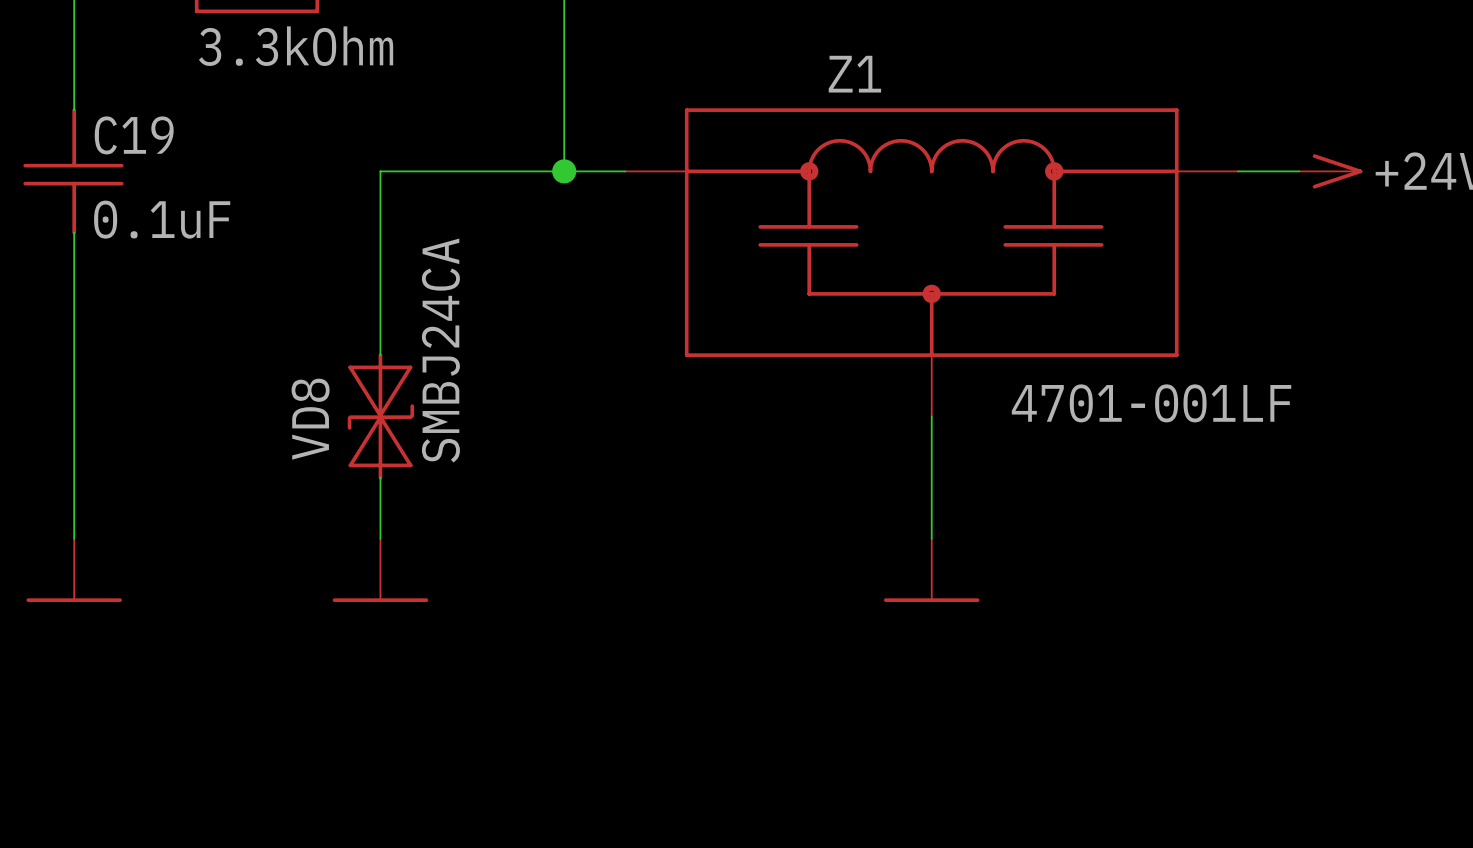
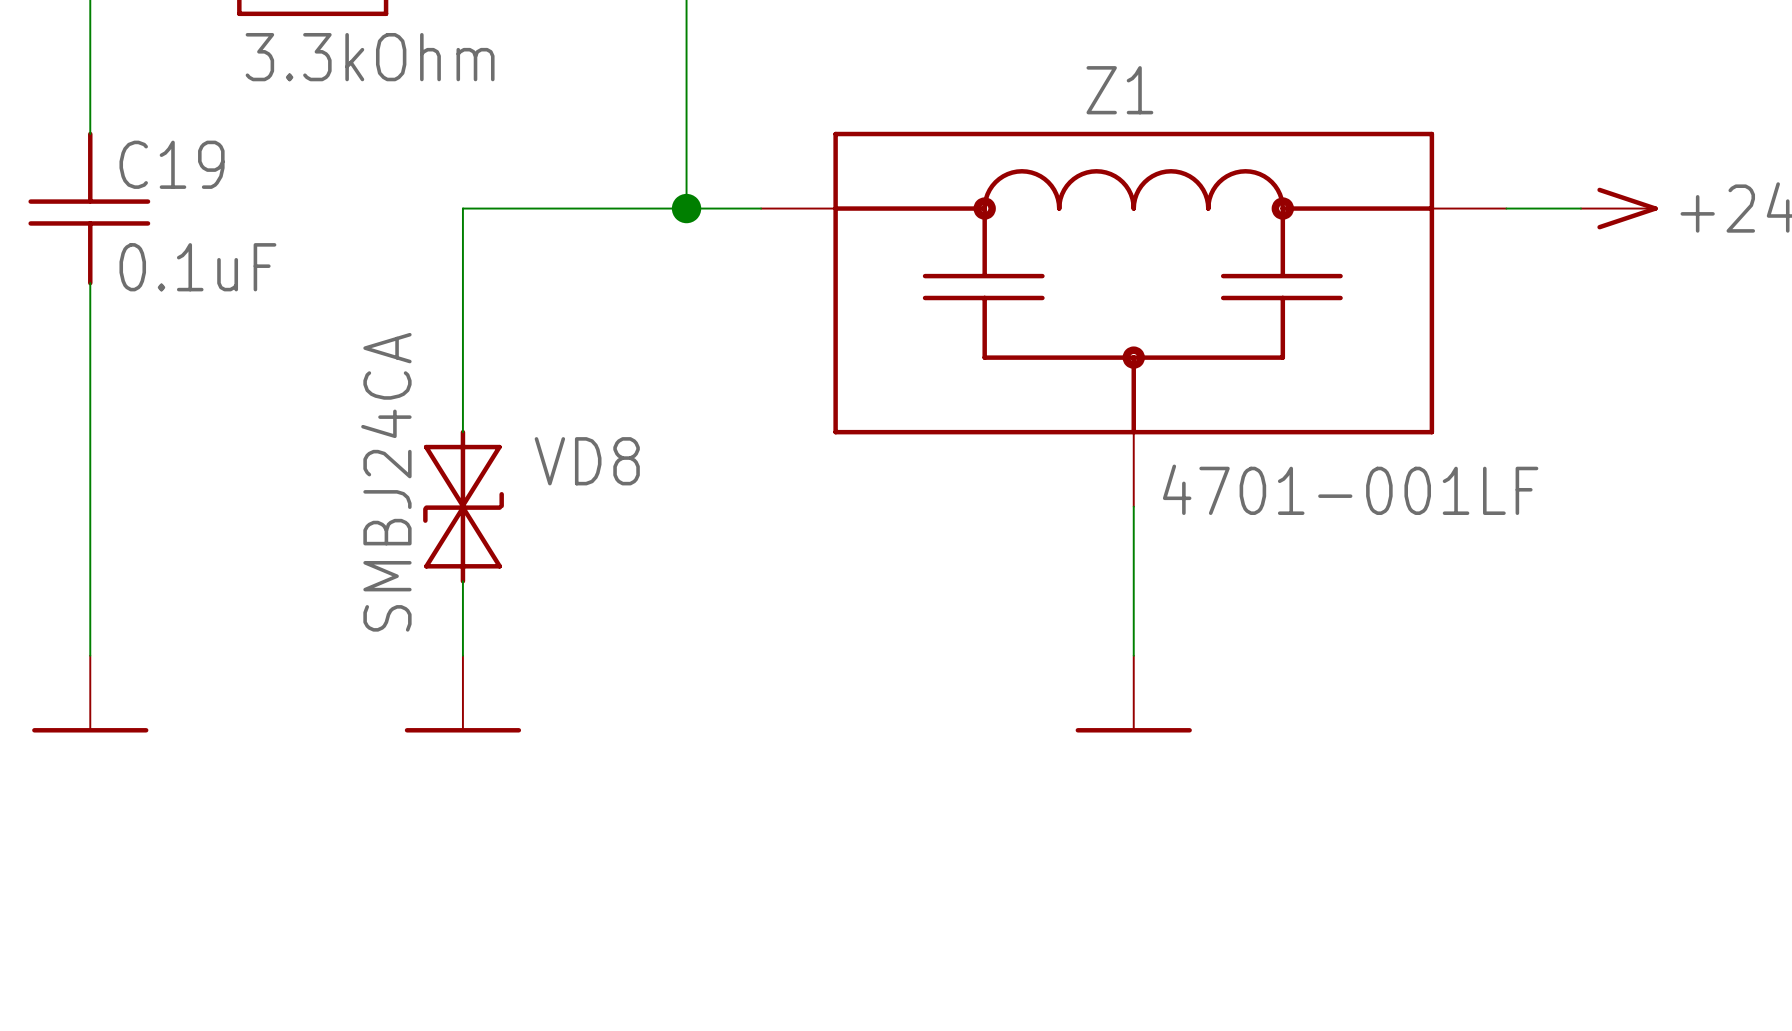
Z1 name position: Z1 (854, 74) -> Z1 (1119, 90)
VD8 value position: SMBJ24CA (440, 350) -> SMBJ24CA (386, 482)
Z1 value position: 4701-001LF (1151, 403) -> 4701-001LF (1350, 489)
VD8 name rotation: 0° (310, 419) -> 90° clockwise (587, 461)
VD8 name position: VD8 (310, 419) -> VD8 (587, 461)

